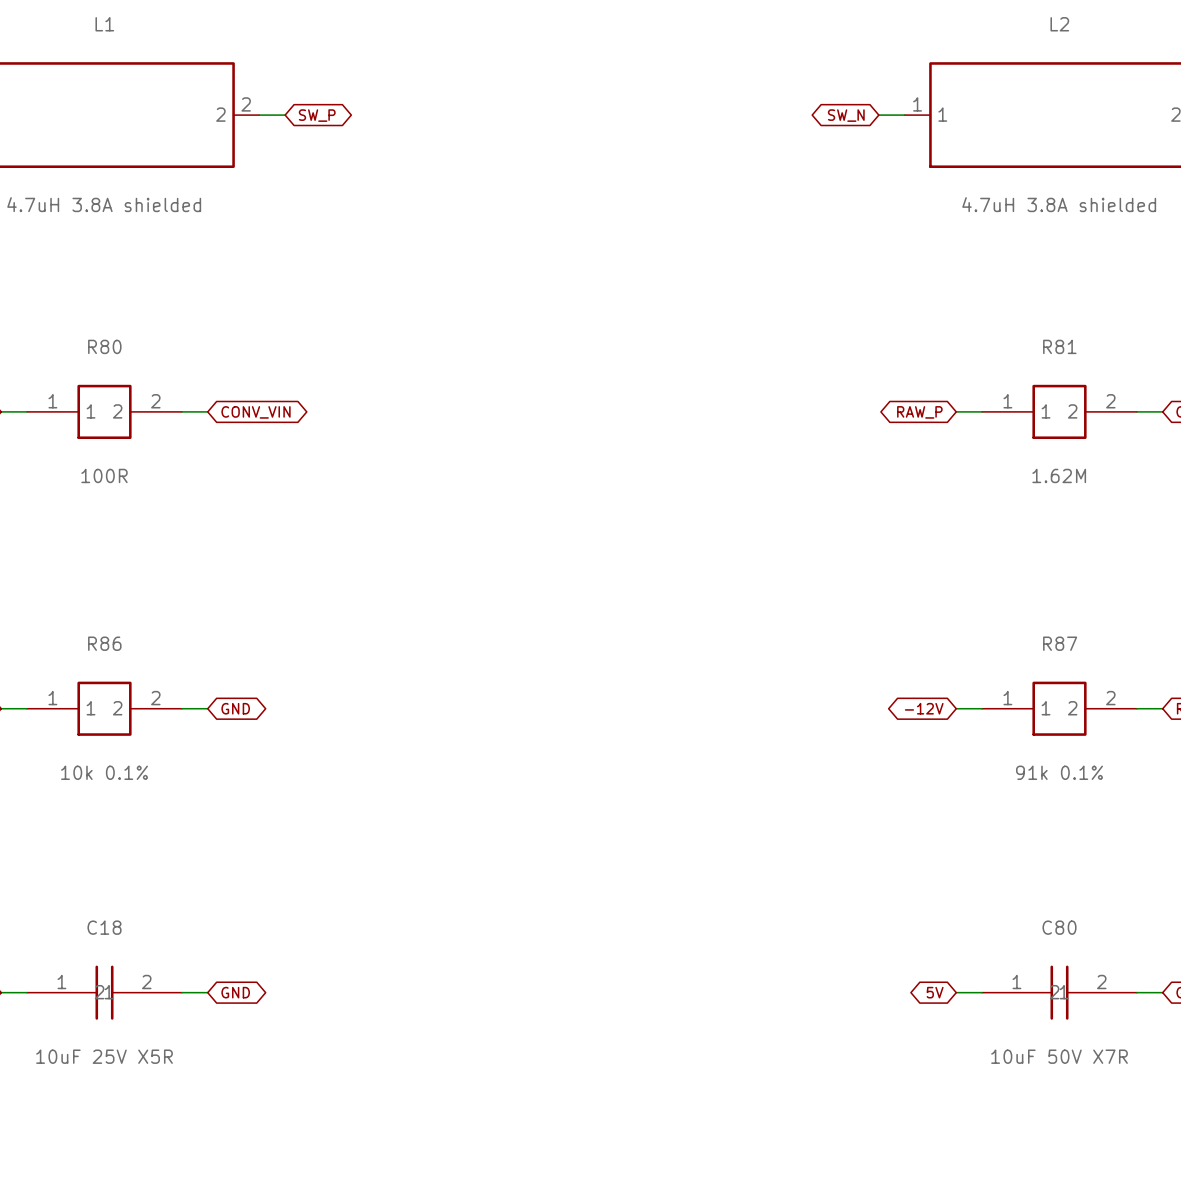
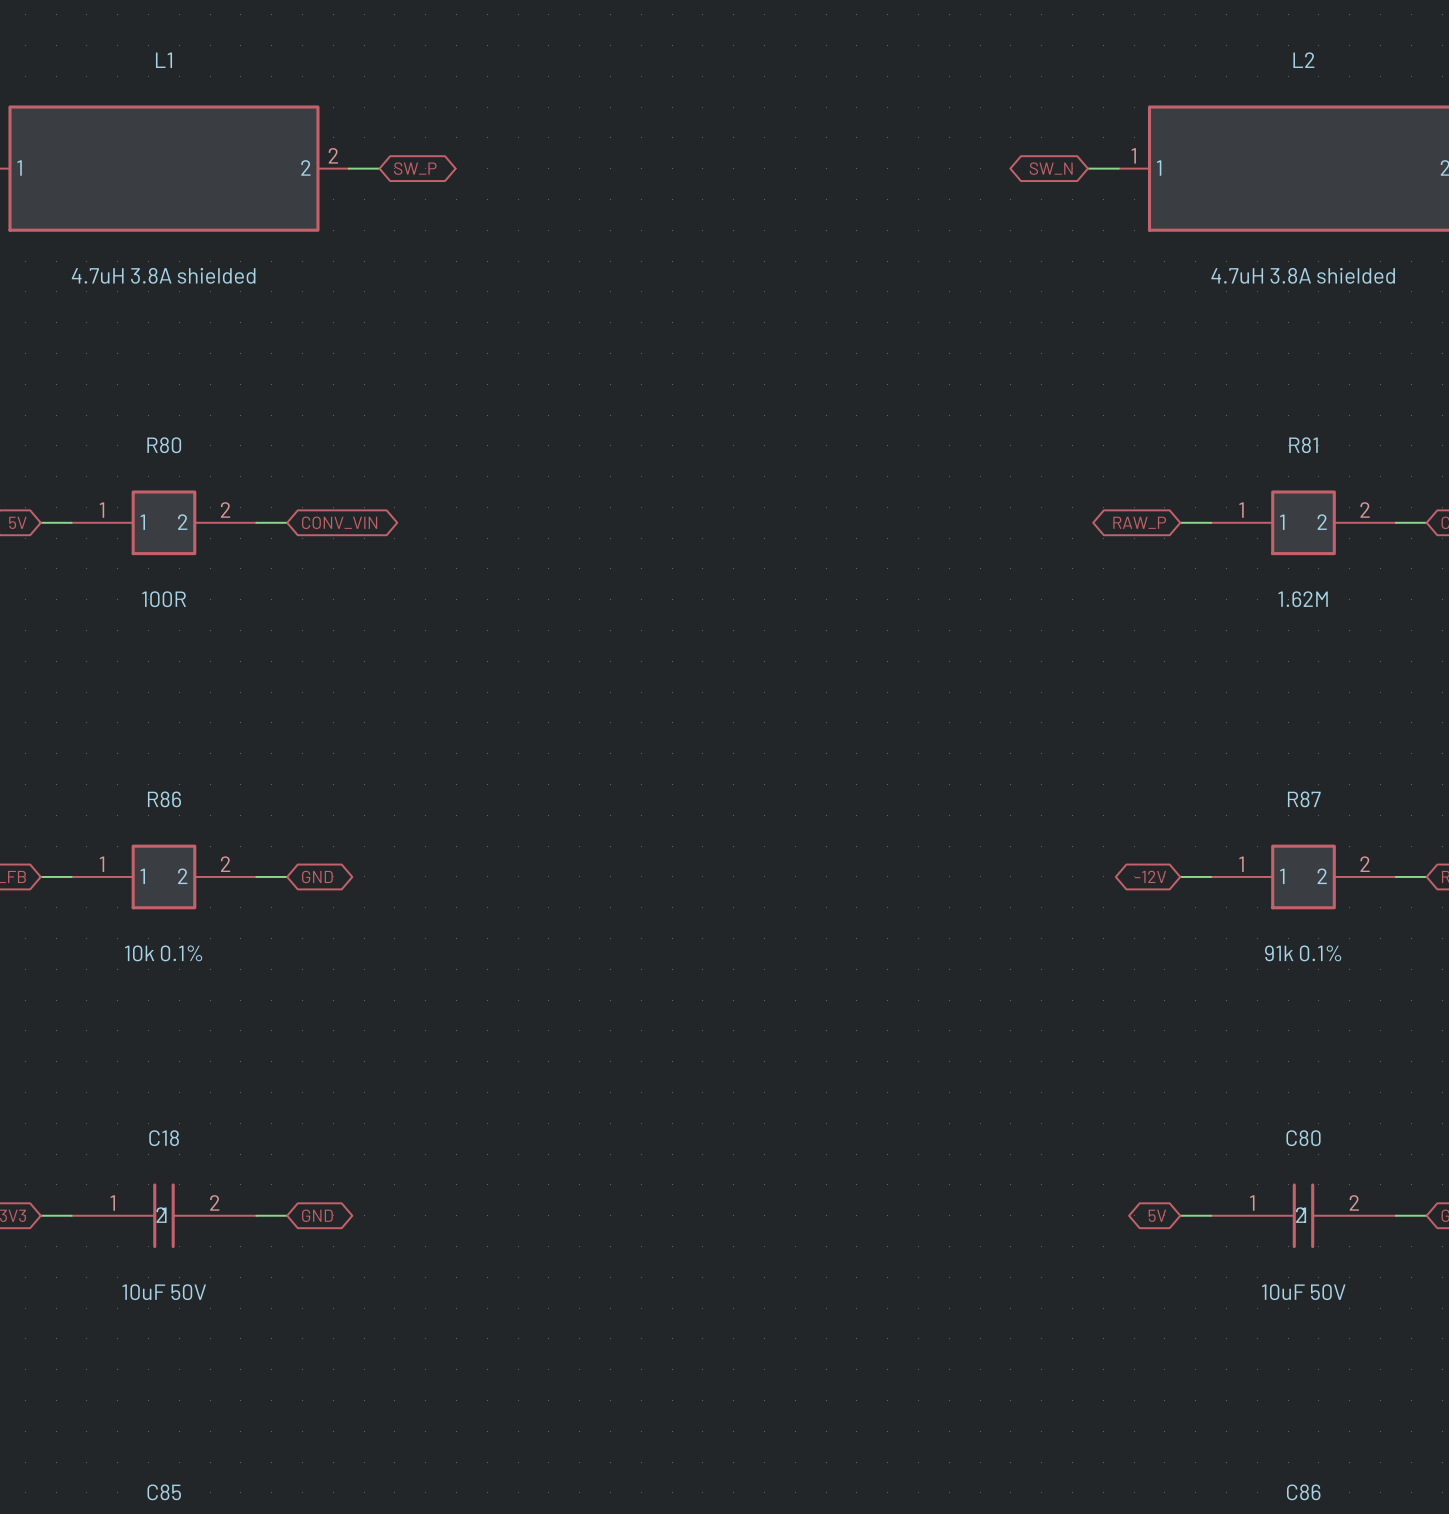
C18 value: 10uF 25V X5R (104, 1056) -> 10uF 50V (164, 1292)
C80 value: 10uF 50V X7R (1059, 1056) -> 10uF 50V (1303, 1292)

